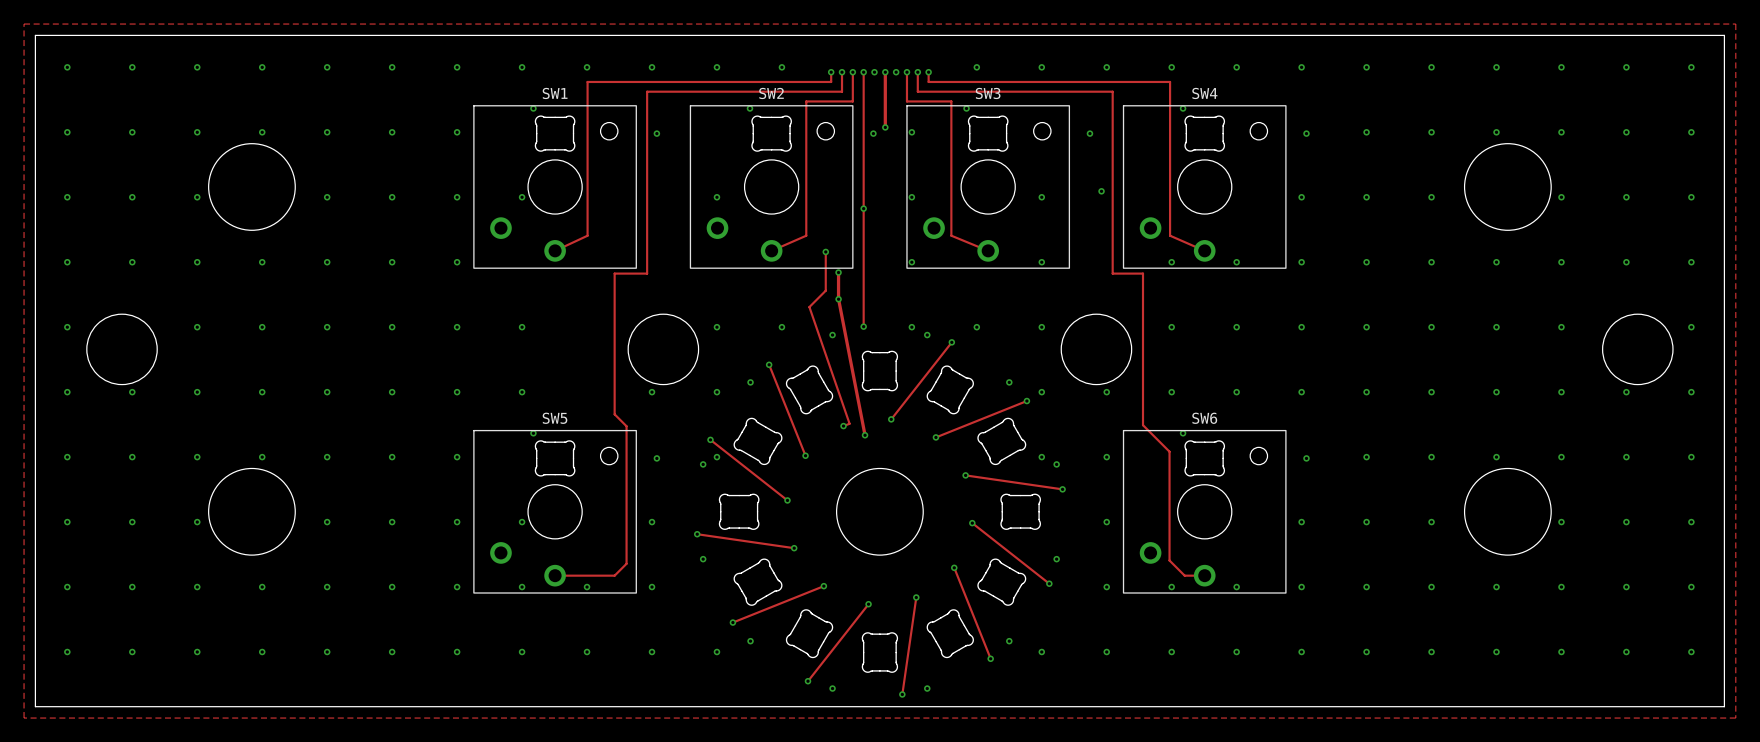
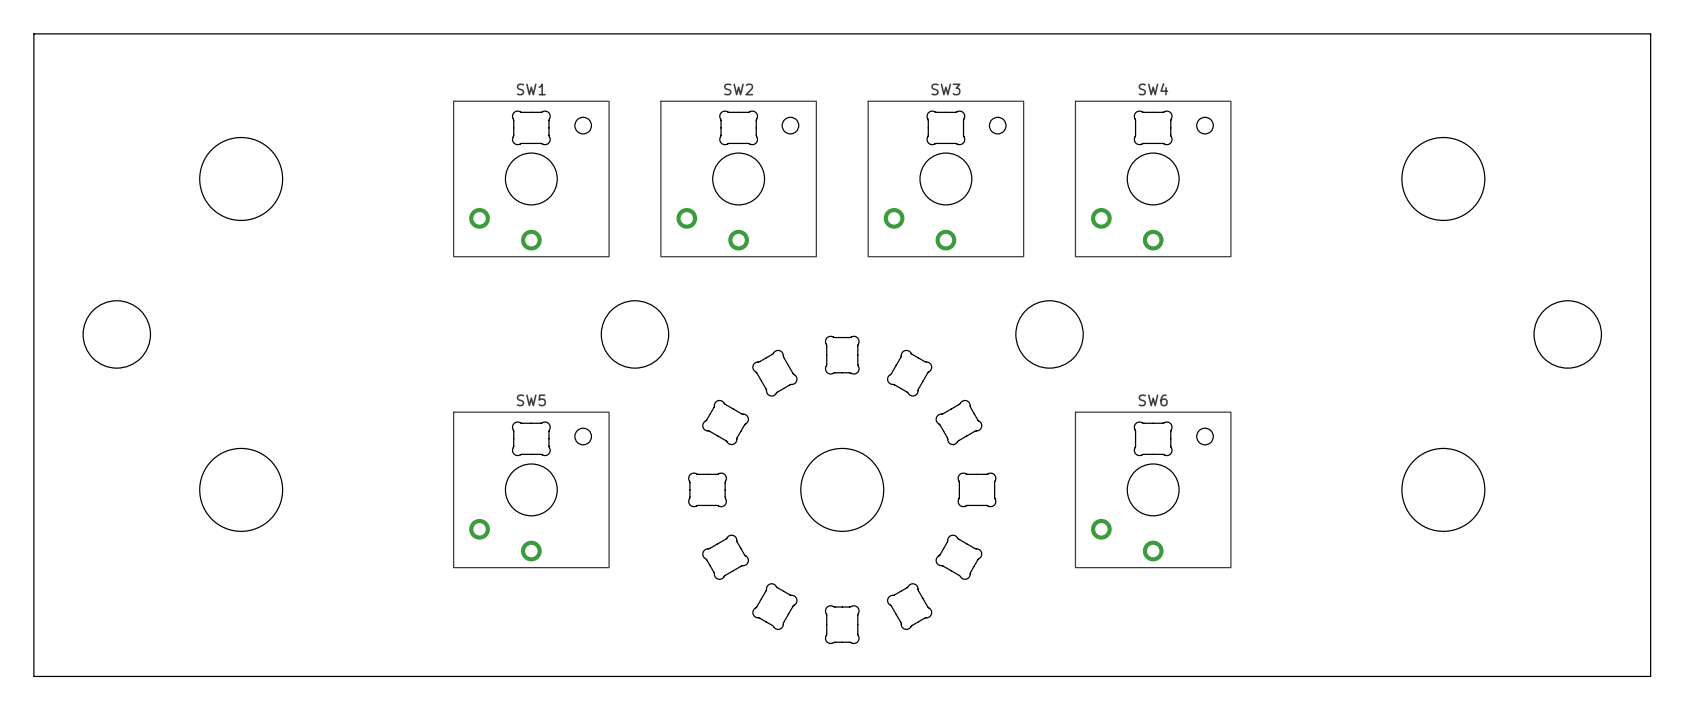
zone outline: (24, 24) (1735, 24) (1735, 718) (24, 718) (24, 24) -> none
via: (67, 67) -> none
via: (132, 67) -> none
via: (197, 67) -> none
via: (262, 67) -> none
via: (327, 67) -> none
via: (392, 67) -> none
via: (457, 67) -> none
via: (522, 67) -> none
via: (587, 67) -> none
via: (652, 67) -> none
via: (716, 67) -> none
via: (781, 67) -> none
via: (976, 67) -> none
via: (1041, 67) -> none
via: (1106, 67) -> none
via: (1171, 67) -> none
via: (1236, 67) -> none
via: (1301, 67) -> none
via: (1366, 67) -> none
via: (1431, 67) -> none
via: (1496, 67) -> none
via: (1561, 67) -> none
via: (1626, 67) -> none
via: (1691, 67) -> none
track: (831, 72) (831, 81) (587, 81) (587, 235) (555, 250) -> none
via: (831, 72) -> none
track: (842, 72) (842, 91) (647, 91) (647, 273) (614, 273) (614, 414) (626, 426) (626, 563) (614, 575) (555, 575) -> none
via: (842, 72) -> none
track: (852, 72) (852, 101) (806, 101) (806, 235) (771, 250) -> none
via: (852, 72) -> none
track: (863, 72) (863, 326) -> none
via: (863, 72) -> none
via: (874, 72) -> none
track: (885, 72) (885, 127) -> none
via: (885, 72) -> none
via: (896, 72) -> none
track: (906, 72) (906, 101) (951, 101) (951, 235) (988, 250) -> none
via: (906, 72) -> none
track: (917, 72) (917, 91) (1112, 91) (1112, 273) (1143, 273) (1143, 425) (1169, 451) (1169, 560) (1184, 575) (1204, 575) -> none
via: (917, 72) -> none
track: (928, 72) (928, 81) (1170, 81) (1170, 235) (1204, 250) -> none
via: (928, 72) -> none
via: (533, 108) -> none
via: (749, 108) -> none
via: (966, 108) -> none
via: (1183, 108) -> none
via: (885, 127) -> none
via: (67, 132) -> none
via: (132, 132) -> none
via: (197, 132) -> none
via: (262, 132) -> none
via: (327, 132) -> none
via: (392, 132) -> none
via: (457, 132) -> none
via: (911, 132) -> none
via: (1366, 132) -> none
via: (1431, 132) -> none
via: (1496, 132) -> none
via: (1561, 132) -> none
via: (1626, 132) -> none
via: (1691, 132) -> none
via: (656, 133) -> none
via: (873, 133) -> none
via: (1089, 133) -> none
via: (1306, 133) -> none
via: (1101, 191) -> none
via: (67, 197) -> none
via: (132, 197) -> none
via: (197, 197) -> none
via: (327, 197) -> none
via: (392, 197) -> none
via: (457, 197) -> none
via: (522, 197) -> none
via: (716, 197) -> none
via: (911, 197) -> none
via: (1041, 197) -> none
via: (1301, 197) -> none
via: (1366, 197) -> none
via: (1431, 197) -> none
via: (1561, 197) -> none
via: (1626, 197) -> none
via: (1691, 197) -> none
via: (863, 208) -> none
track: (825, 251) (825, 290) (809, 307) (849, 423) (843, 426) -> none
via: (825, 251) -> none
via: (67, 262) -> none
via: (132, 262) -> none
via: (197, 262) -> none
via: (262, 262) -> none
via: (327, 262) -> none
via: (392, 262) -> none
via: (457, 262) -> none
via: (911, 262) -> none
via: (1041, 262) -> none
via: (1171, 262) -> none
via: (1236, 262) -> none
via: (1301, 262) -> none
via: (1366, 262) -> none
via: (1431, 262) -> none
via: (1496, 262) -> none
via: (1561, 262) -> none
via: (1626, 262) -> none
via: (1691, 262) -> none
track: (838, 272) (838, 299) (865, 435) -> none
via: (838, 272) -> none
via: (838, 299) -> none
via: (863, 326) -> none
via: (67, 327) -> none
via: (197, 327) -> none
via: (262, 327) -> none
via: (327, 327) -> none
via: (392, 327) -> none
via: (457, 327) -> none
via: (522, 327) -> none
via: (716, 327) -> none
via: (781, 327) -> none
via: (911, 327) -> none
via: (976, 327) -> none
via: (1041, 327) -> none
via: (1171, 327) -> none
via: (1236, 327) -> none
via: (1301, 327) -> none
via: (1366, 327) -> none
via: (1431, 327) -> none
via: (1496, 327) -> none
via: (1561, 327) -> none
via: (1691, 327) -> none
via: (832, 335) -> none
via: (927, 335) -> none
track: (951, 342) (891, 419) -> none
via: (951, 342) -> none
track: (769, 364) (805, 455) -> none
via: (769, 364) -> none
via: (750, 382) -> none
via: (1009, 382) -> none
via: (67, 392) -> none
via: (132, 392) -> none
via: (197, 392) -> none
via: (262, 392) -> none
via: (327, 392) -> none
via: (392, 392) -> none
via: (457, 392) -> none
via: (522, 392) -> none
via: (652, 392) -> none
via: (716, 392) -> none
via: (1041, 392) -> none
via: (1106, 392) -> none
via: (1171, 392) -> none
via: (1236, 392) -> none
via: (1301, 392) -> none
via: (1366, 392) -> none
via: (1431, 392) -> none
via: (1496, 392) -> none
via: (1561, 392) -> none
via: (1626, 392) -> none
via: (1691, 392) -> none
track: (1026, 401) (935, 437) -> none
via: (1026, 401) -> none
via: (891, 419) -> none
via: (843, 426) -> none
via: (533, 433) -> none
via: (1183, 433) -> none
via: (865, 435) -> none
via: (935, 437) -> none
track: (710, 439) (787, 500) -> none
via: (710, 439) -> none
via: (805, 455) -> none
via: (67, 457) -> none
via: (132, 457) -> none
via: (197, 457) -> none
via: (262, 457) -> none
via: (327, 457) -> none
via: (392, 457) -> none
via: (457, 457) -> none
via: (716, 457) -> none
via: (1041, 457) -> none
via: (1106, 457) -> none
via: (1366, 457) -> none
via: (1431, 457) -> none
via: (1496, 457) -> none
via: (1561, 457) -> none
via: (1626, 457) -> none
via: (1691, 457) -> none
via: (656, 458) -> none
via: (1306, 458) -> none
via: (703, 464) -> none
via: (1056, 464) -> none
track: (965, 475) (1062, 489) -> none
via: (965, 475) -> none
via: (1062, 489) -> none
via: (787, 500) -> none
via: (67, 522) -> none
via: (132, 522) -> none
via: (197, 522) -> none
via: (327, 522) -> none
via: (392, 522) -> none
via: (457, 522) -> none
via: (522, 522) -> none
via: (652, 522) -> none
via: (1106, 522) -> none
via: (1301, 522) -> none
via: (1366, 522) -> none
via: (1431, 522) -> none
via: (1561, 522) -> none
via: (1626, 522) -> none
via: (1691, 522) -> none
track: (972, 523) (1049, 583) -> none
via: (972, 523) -> none
track: (697, 534) (794, 548) -> none
via: (697, 534) -> none
via: (794, 548) -> none
via: (703, 559) -> none
via: (1056, 559) -> none
track: (954, 567) (990, 658) -> none
via: (954, 567) -> none
via: (1049, 583) -> none
track: (823, 586) (732, 622) -> none
via: (823, 586) -> none
via: (67, 587) -> none
via: (132, 587) -> none
via: (197, 587) -> none
via: (262, 587) -> none
via: (327, 587) -> none
via: (392, 587) -> none
via: (457, 587) -> none
via: (522, 587) -> none
via: (587, 587) -> none
via: (652, 587) -> none
via: (1106, 587) -> none
via: (1171, 587) -> none
via: (1236, 587) -> none
via: (1301, 587) -> none
via: (1366, 587) -> none
via: (1431, 587) -> none
via: (1496, 587) -> none
via: (1561, 587) -> none
via: (1626, 587) -> none
via: (1691, 587) -> none
track: (916, 597) (902, 694) -> none
via: (916, 597) -> none
track: (868, 604) (807, 681) -> none
via: (868, 604) -> none
via: (732, 622) -> none
via: (750, 641) -> none
via: (1009, 641) -> none
via: (67, 652) -> none
via: (132, 652) -> none
via: (197, 652) -> none
via: (262, 652) -> none
via: (327, 652) -> none
via: (392, 652) -> none
via: (457, 652) -> none
via: (522, 652) -> none
via: (587, 652) -> none
via: (652, 652) -> none
via: (716, 652) -> none
via: (1041, 652) -> none
via: (1106, 652) -> none
via: (1171, 652) -> none
via: (1236, 652) -> none
via: (1301, 652) -> none
via: (1366, 652) -> none
via: (1431, 652) -> none
via: (1496, 652) -> none
via: (1561, 652) -> none
via: (1626, 652) -> none
via: (1691, 652) -> none
via: (990, 658) -> none
via: (807, 681) -> none
via: (832, 688) -> none
via: (927, 688) -> none
via: (902, 694) -> none

